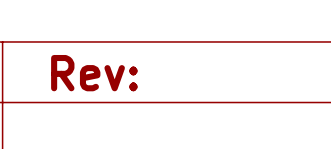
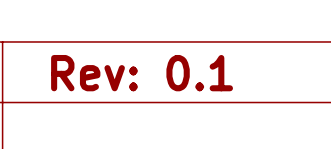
title block: Rev: (94, 73) -> Rev: 0.1 (142, 73)

